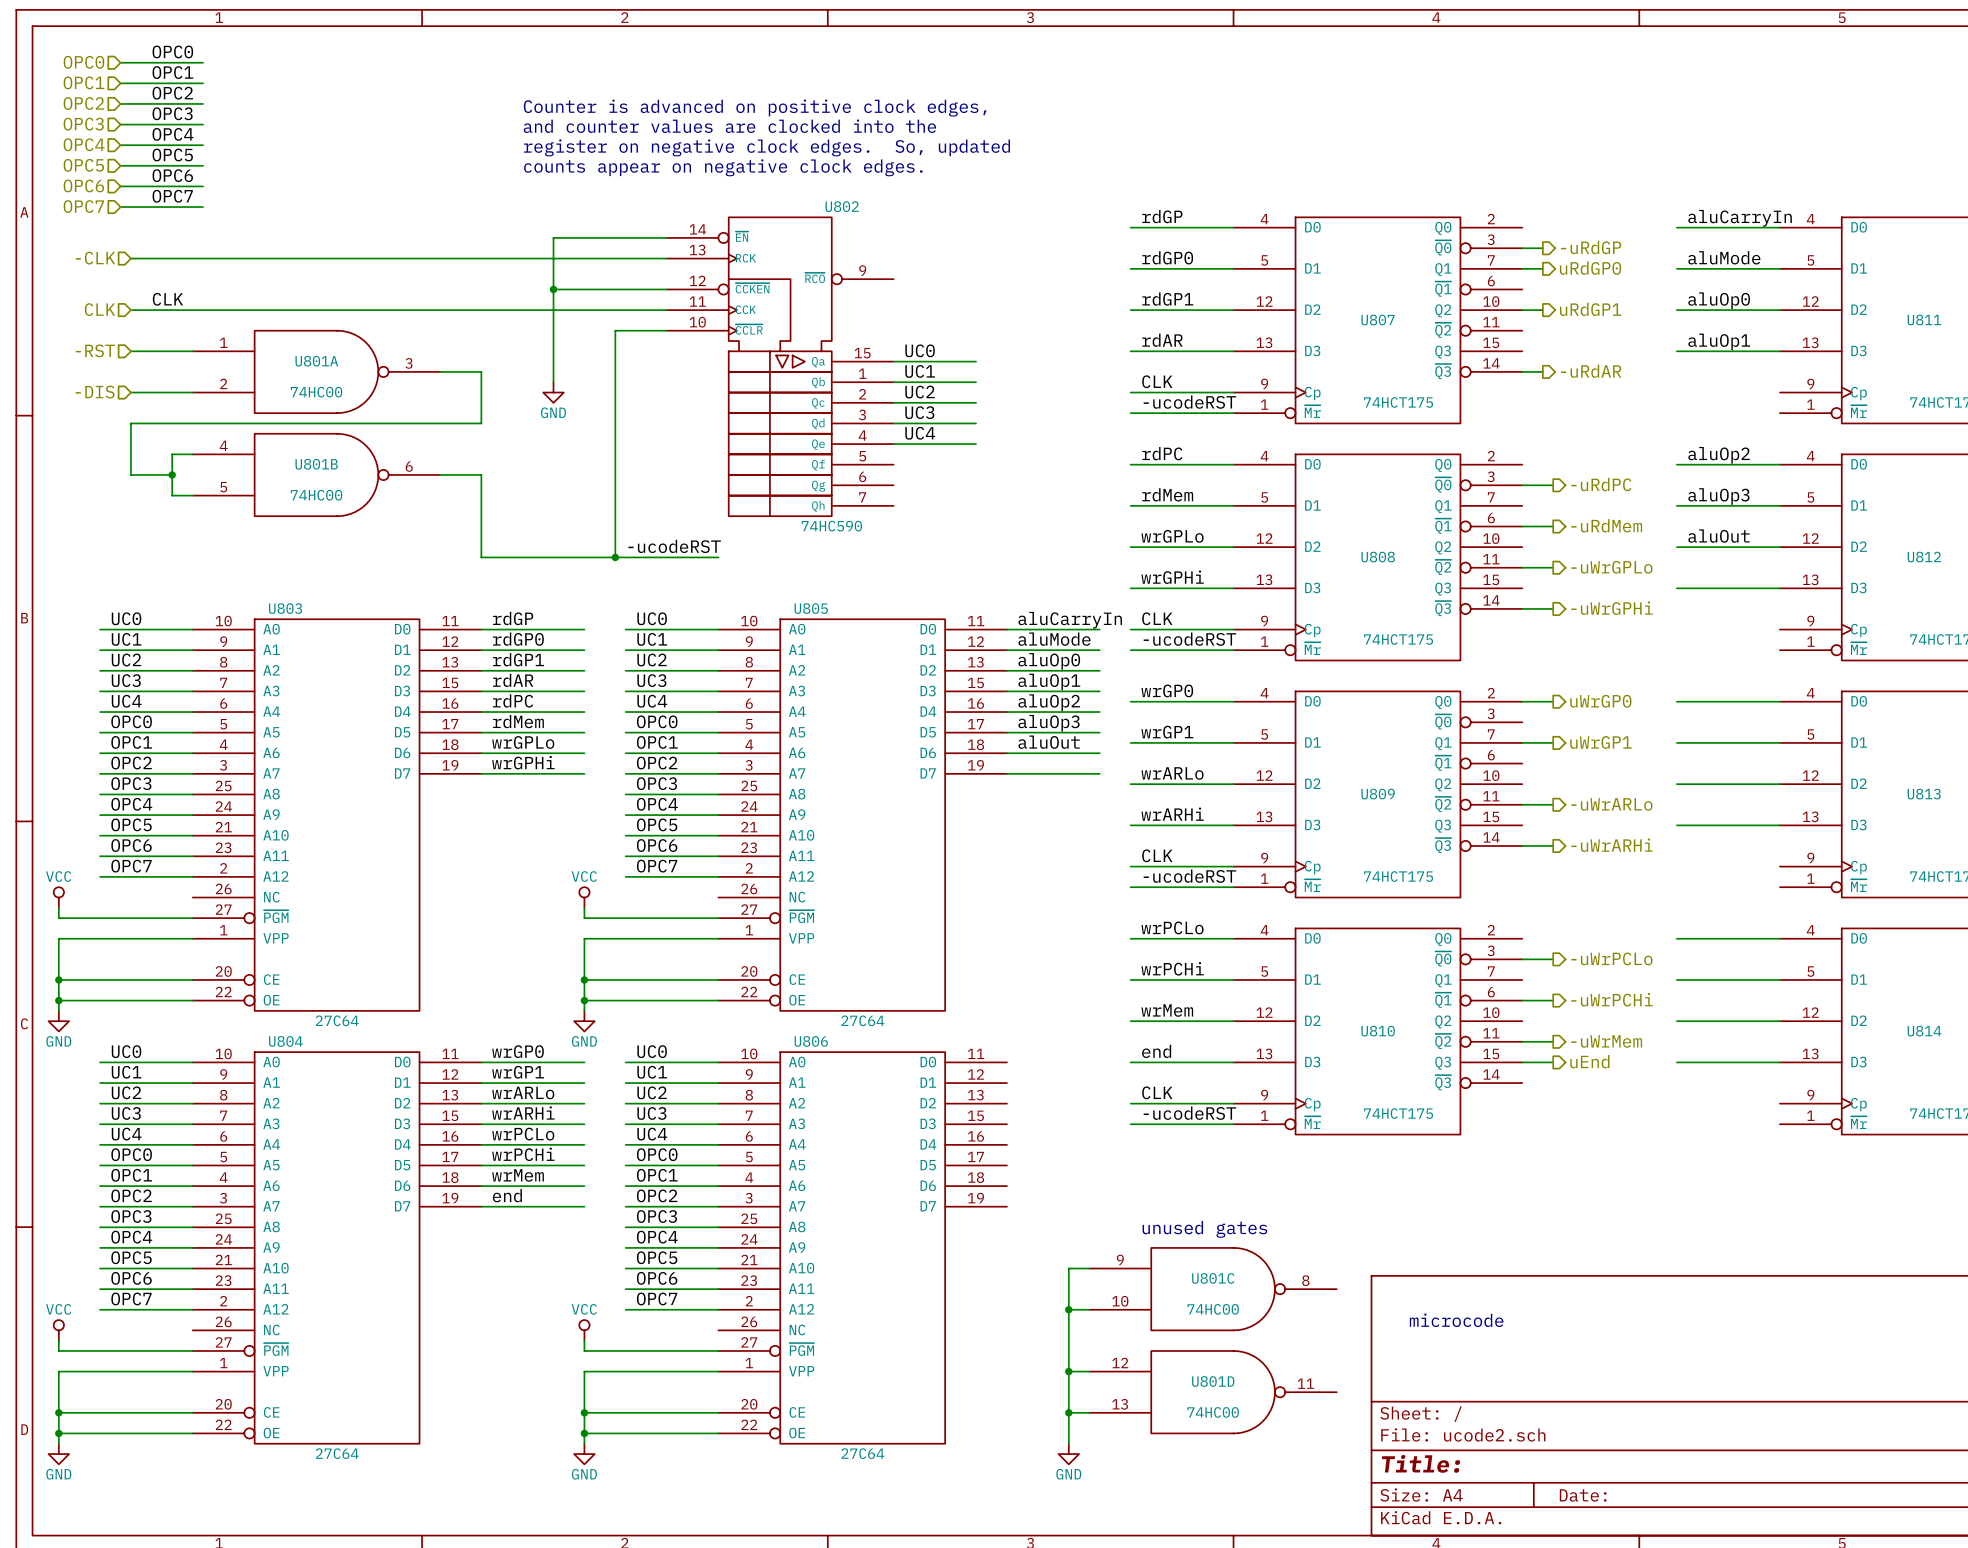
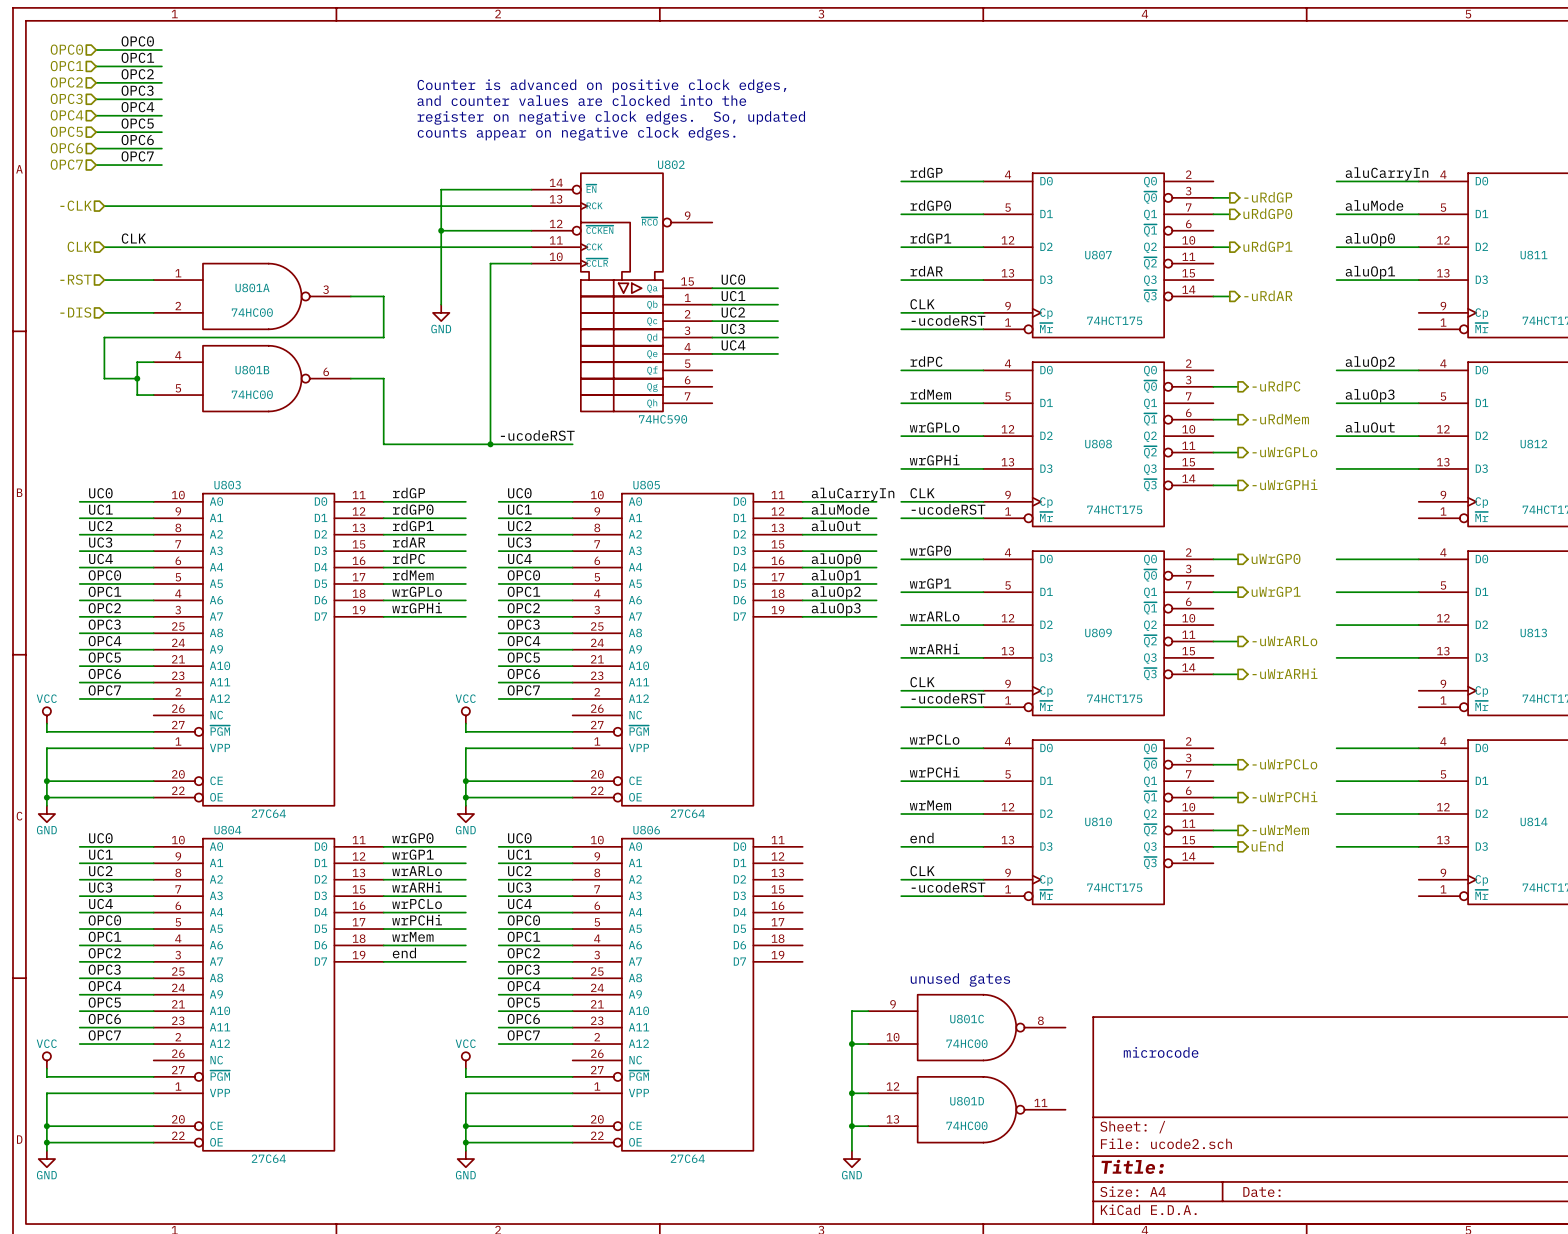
label: aluOp0 (1049, 661) -> aluOut (836, 525)
label: aluOp1 (1049, 682) -> none
label: aluOp2 (1049, 702) -> aluOp0 (836, 560)
label: aluOp3 (1049, 723) -> aluOp1 (836, 576)
label: aluOut (1049, 742) -> aluOp2 (836, 592)
label: none -> aluOp3 (836, 609)

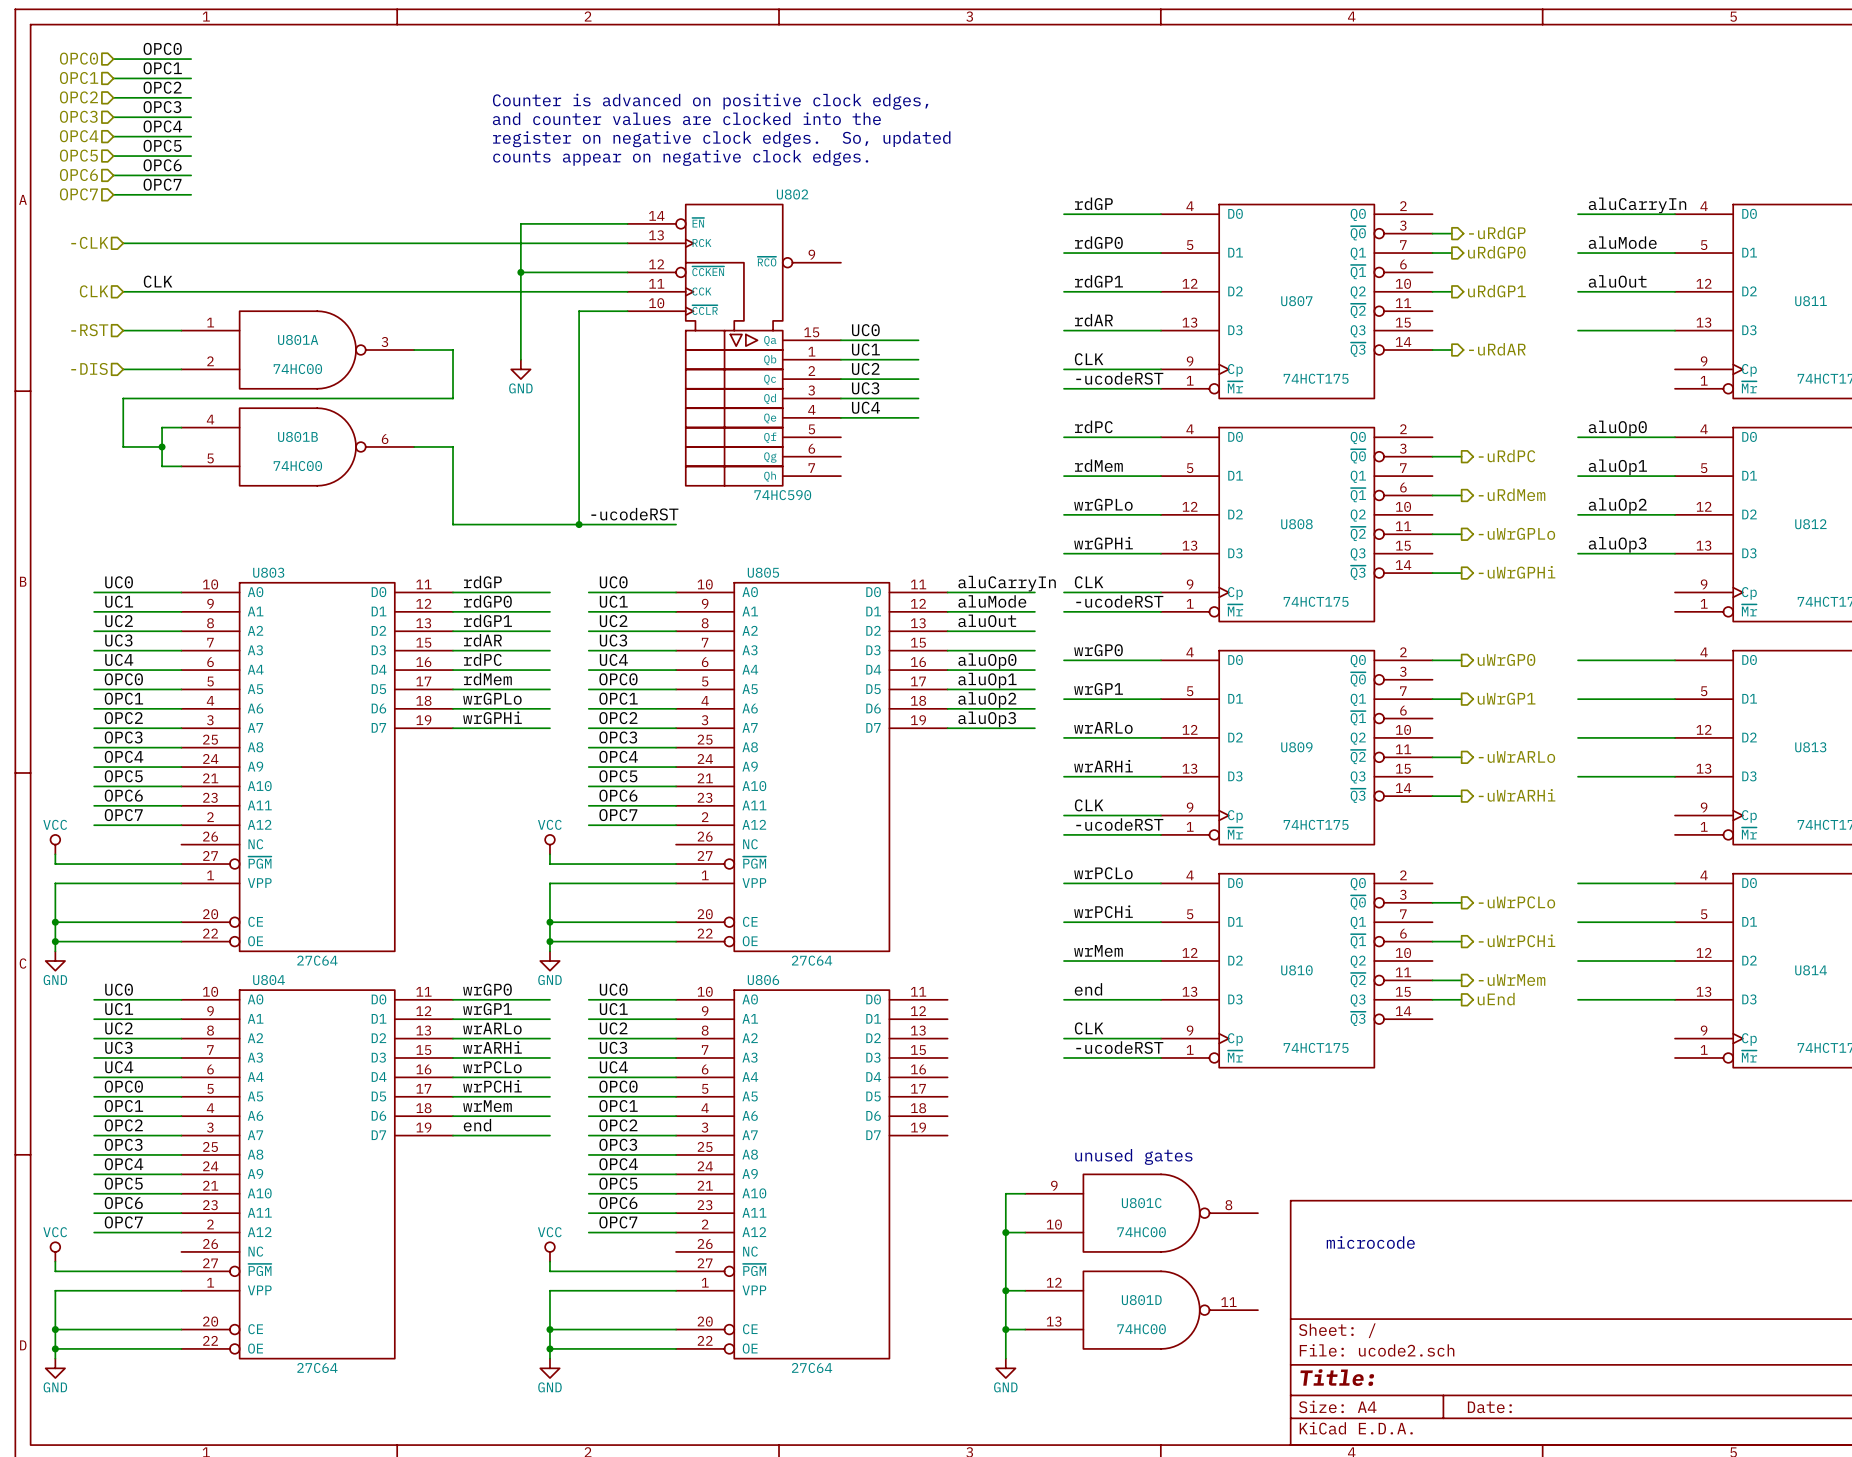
label: aluOp0 (1370, 239) -> aluOut (1617, 281)
label: aluOp1 (1370, 272) -> none
label: aluOp2 (1370, 362) -> aluOp0 (1617, 428)
label: aluOp3 (1370, 395) -> aluOp1 (1617, 467)
label: aluOut (1370, 427) -> aluOp2 (1617, 506)
label: none -> aluOp3 (1617, 544)

